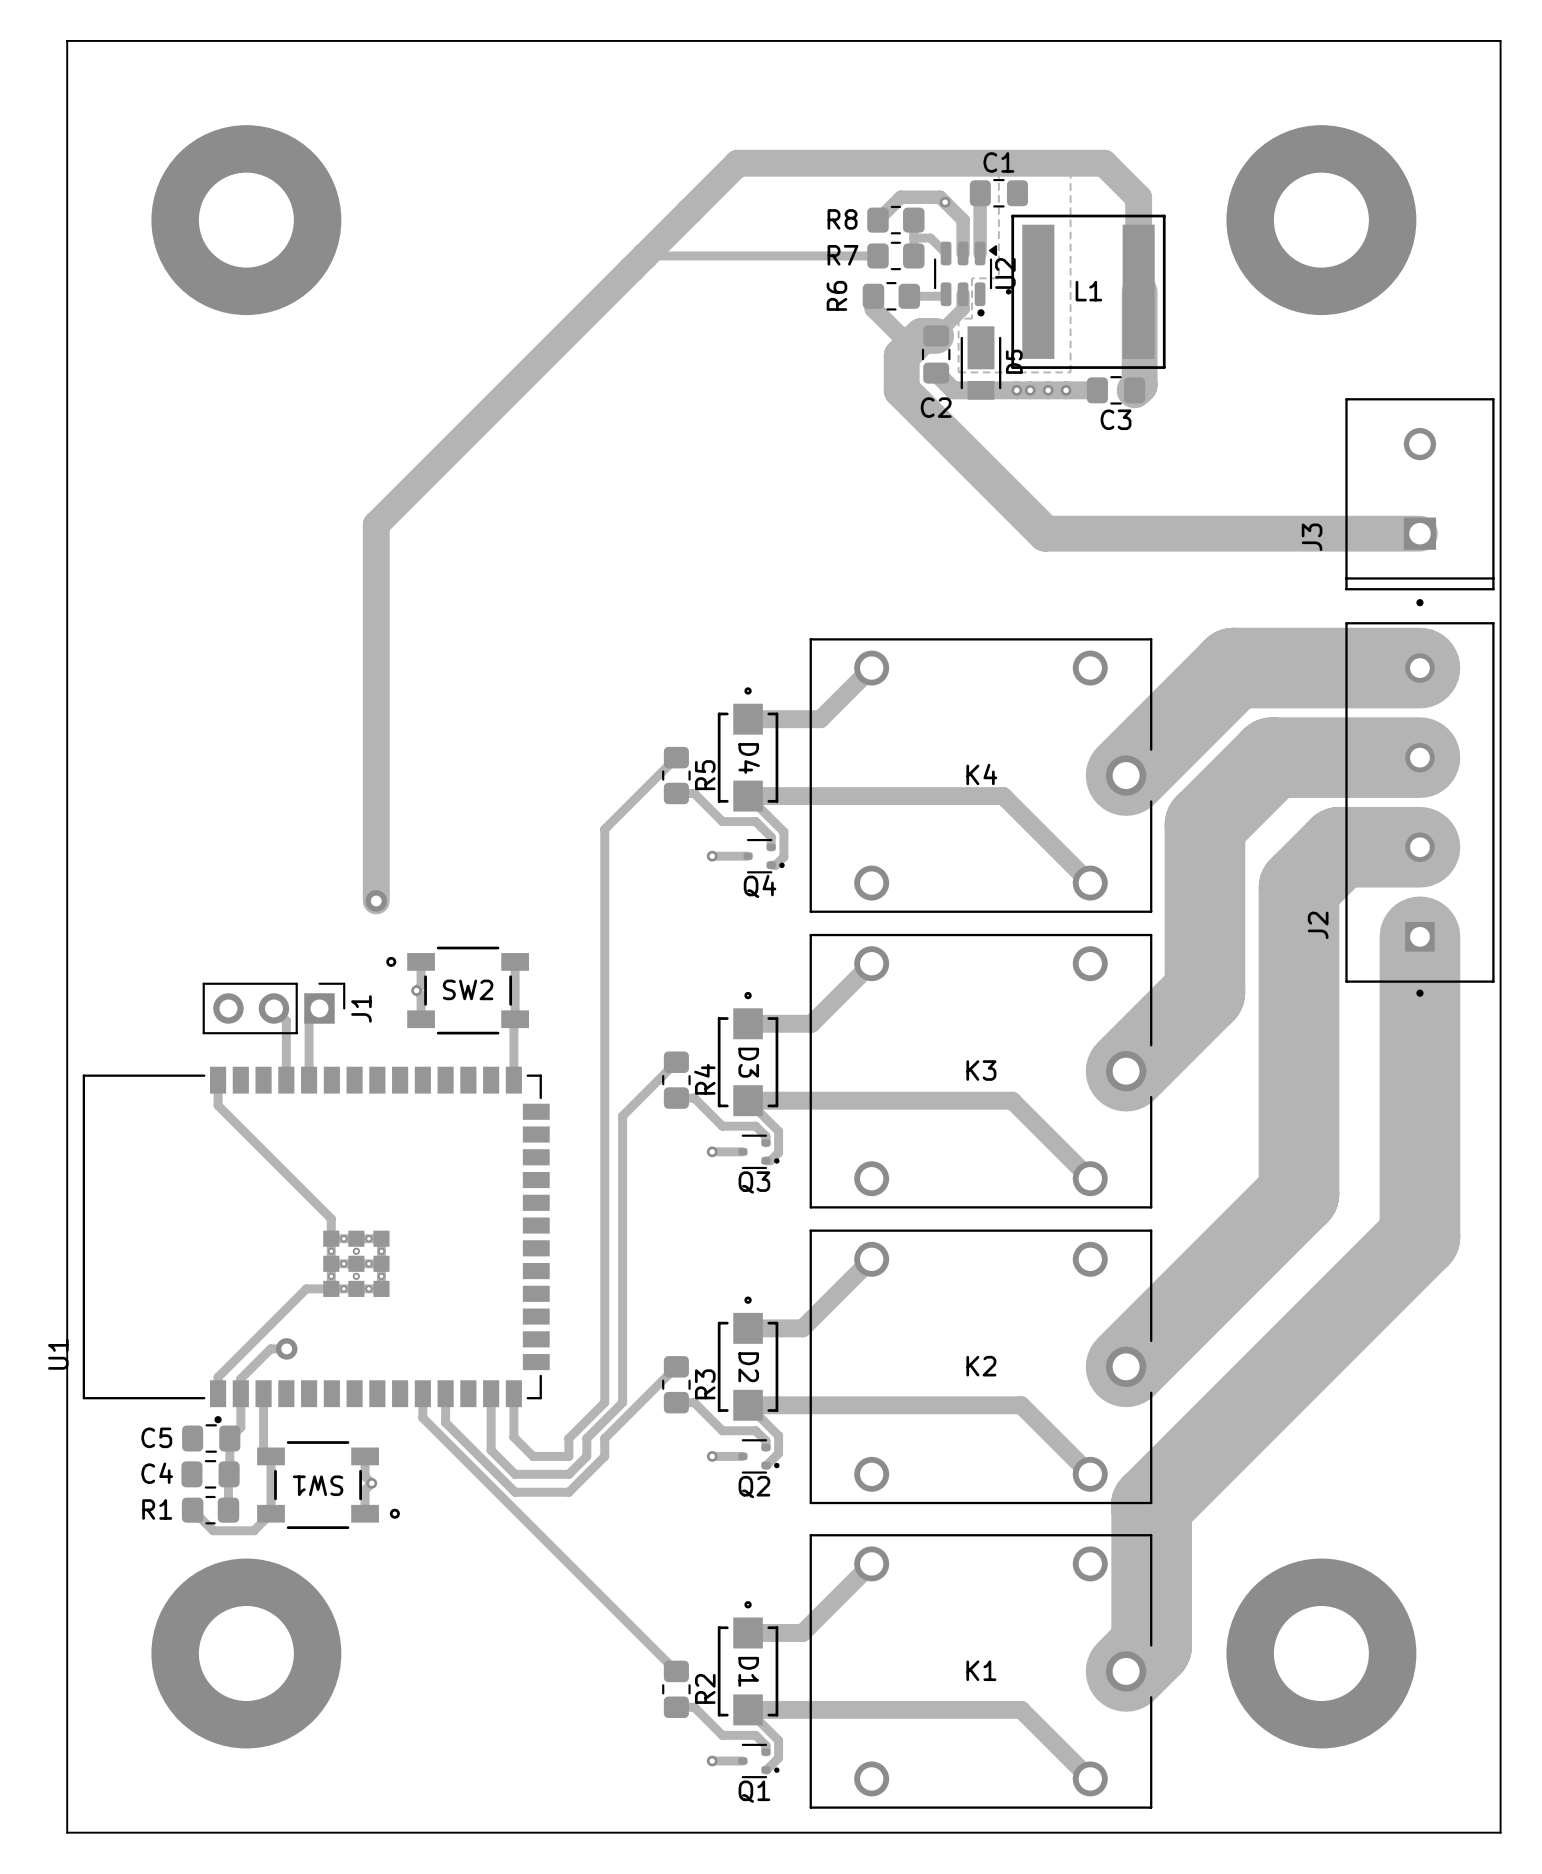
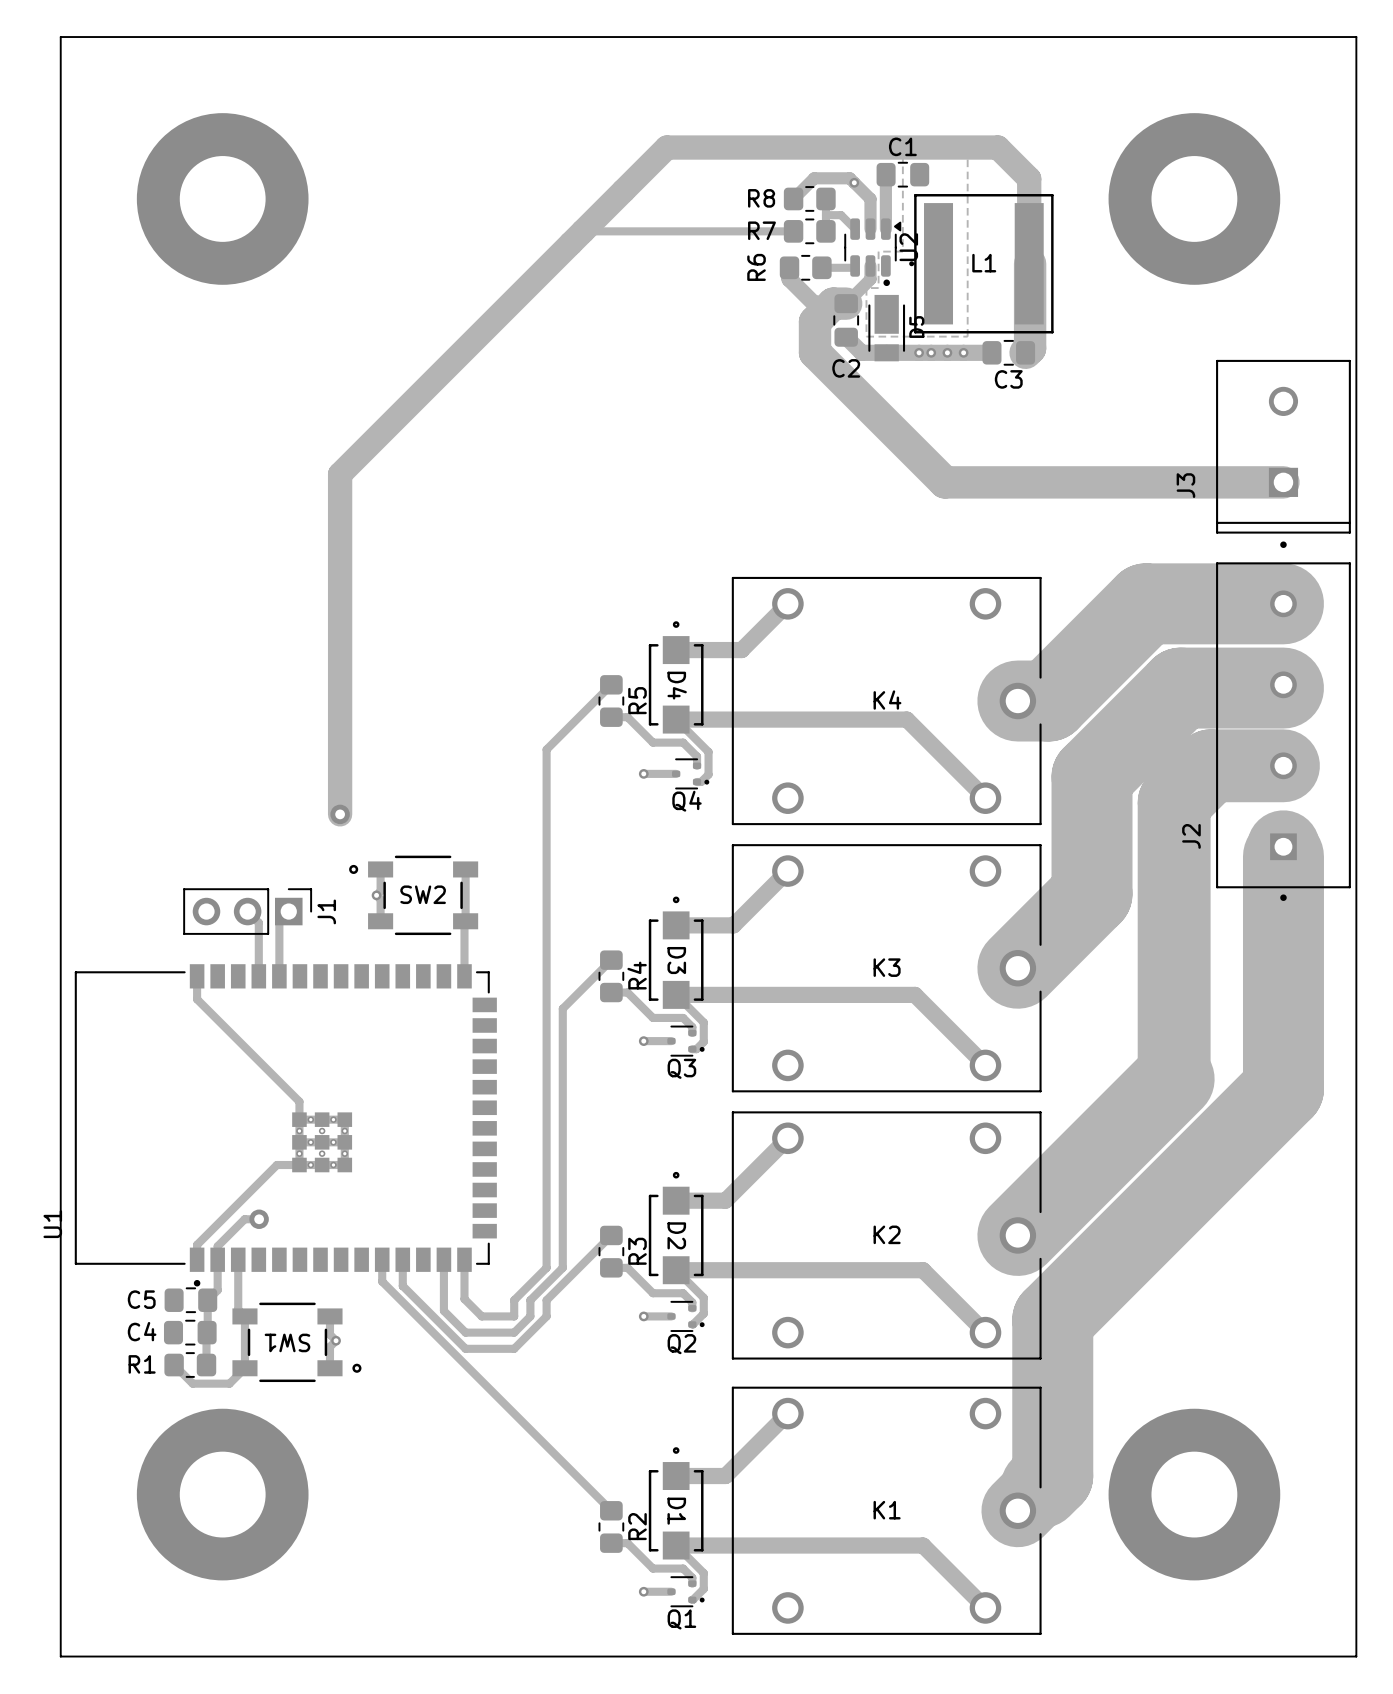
track: (1267, 668) (1233, 668) (1126, 775) -> (1145, 603) (1048, 701) (1017, 701)
track width: thin (1267, 668) (1419, 668) -> thick (1145, 603) (1283, 603)
track: (1419, 757) (1272, 757) (1204, 824) (1204, 992) -> (1283, 688) (1180, 688) (1092, 776) (1092, 894) (1089, 896)
track width: thin (1419, 947) (1419, 1204) -> thick (1283, 856) (1283, 1088)
track width: thin (1204, 992) (1126, 1071) -> thick (1089, 896) (1017, 968)
track width: thin (1299, 1193) (1126, 1366) -> thick (1174, 1079) (1017, 1235)
track: (1419, 1204) (1419, 1236) (1151, 1505) (1151, 1645) -> (1283, 1088) (1052, 1319) (1052, 1475) (1040, 1487)

